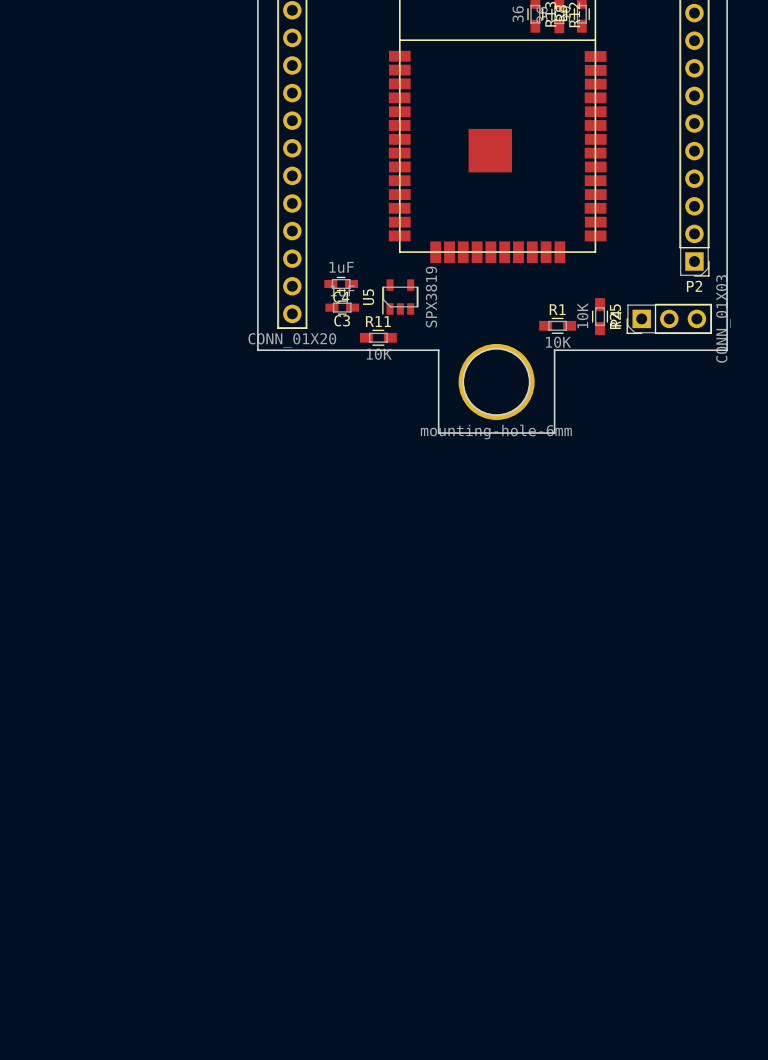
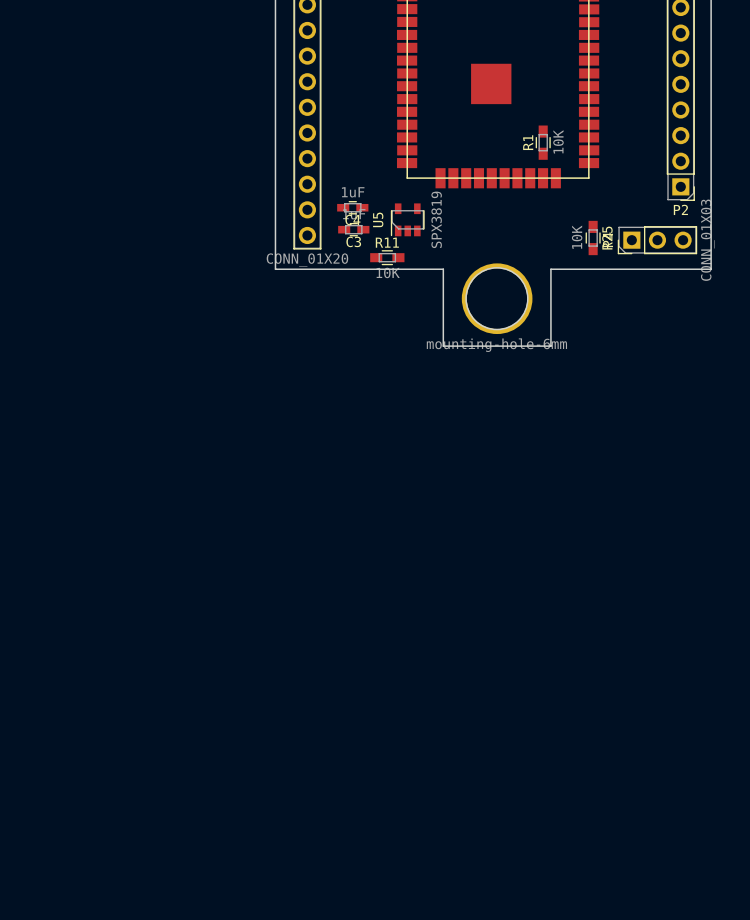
R1 name position: R1 (557, 309) -> R1 (528, 142)
R1 rotation: 0° (557, 325) -> 90° clockwise (543, 142)
R1 position: (557, 325) -> (543, 142)
R1 value position: 10K (558, 342) -> 10K (558, 141)

